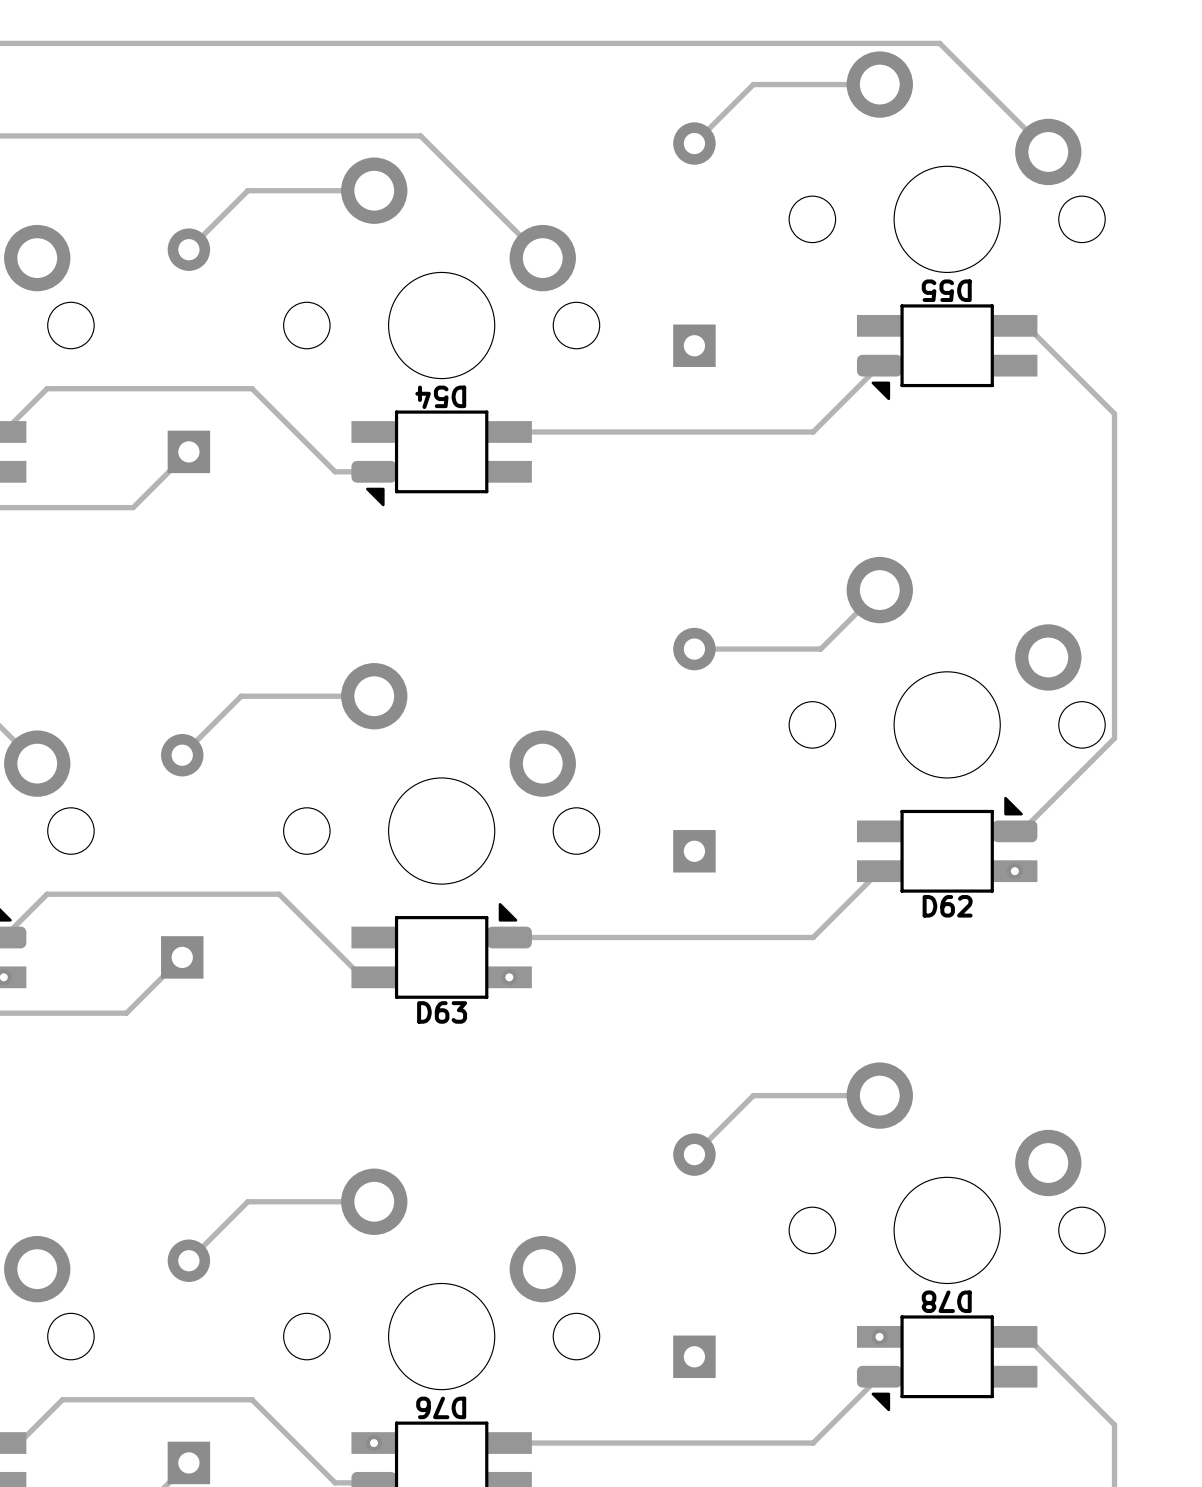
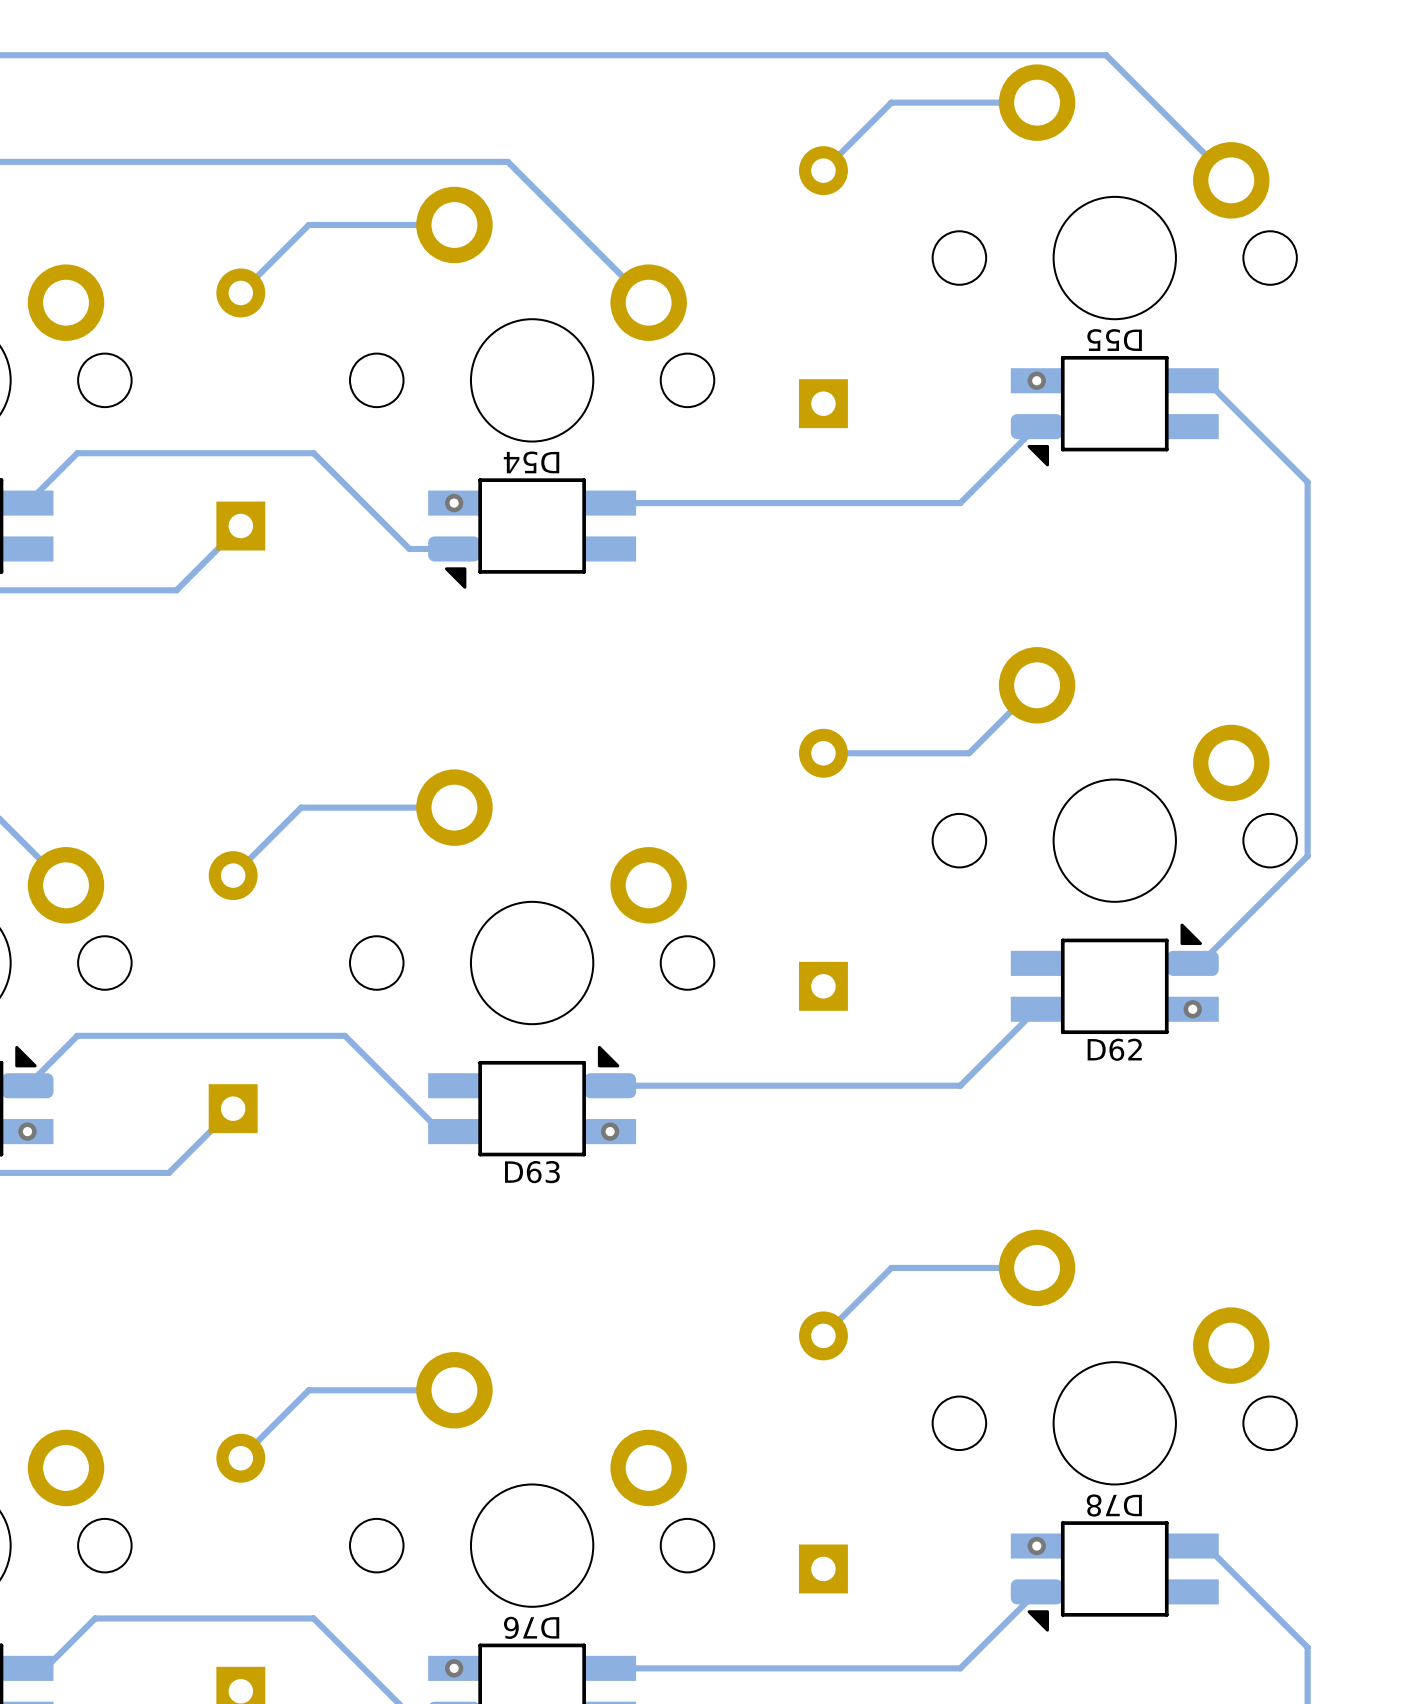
via: none -> (1036, 380)
via: none -> (454, 503)

